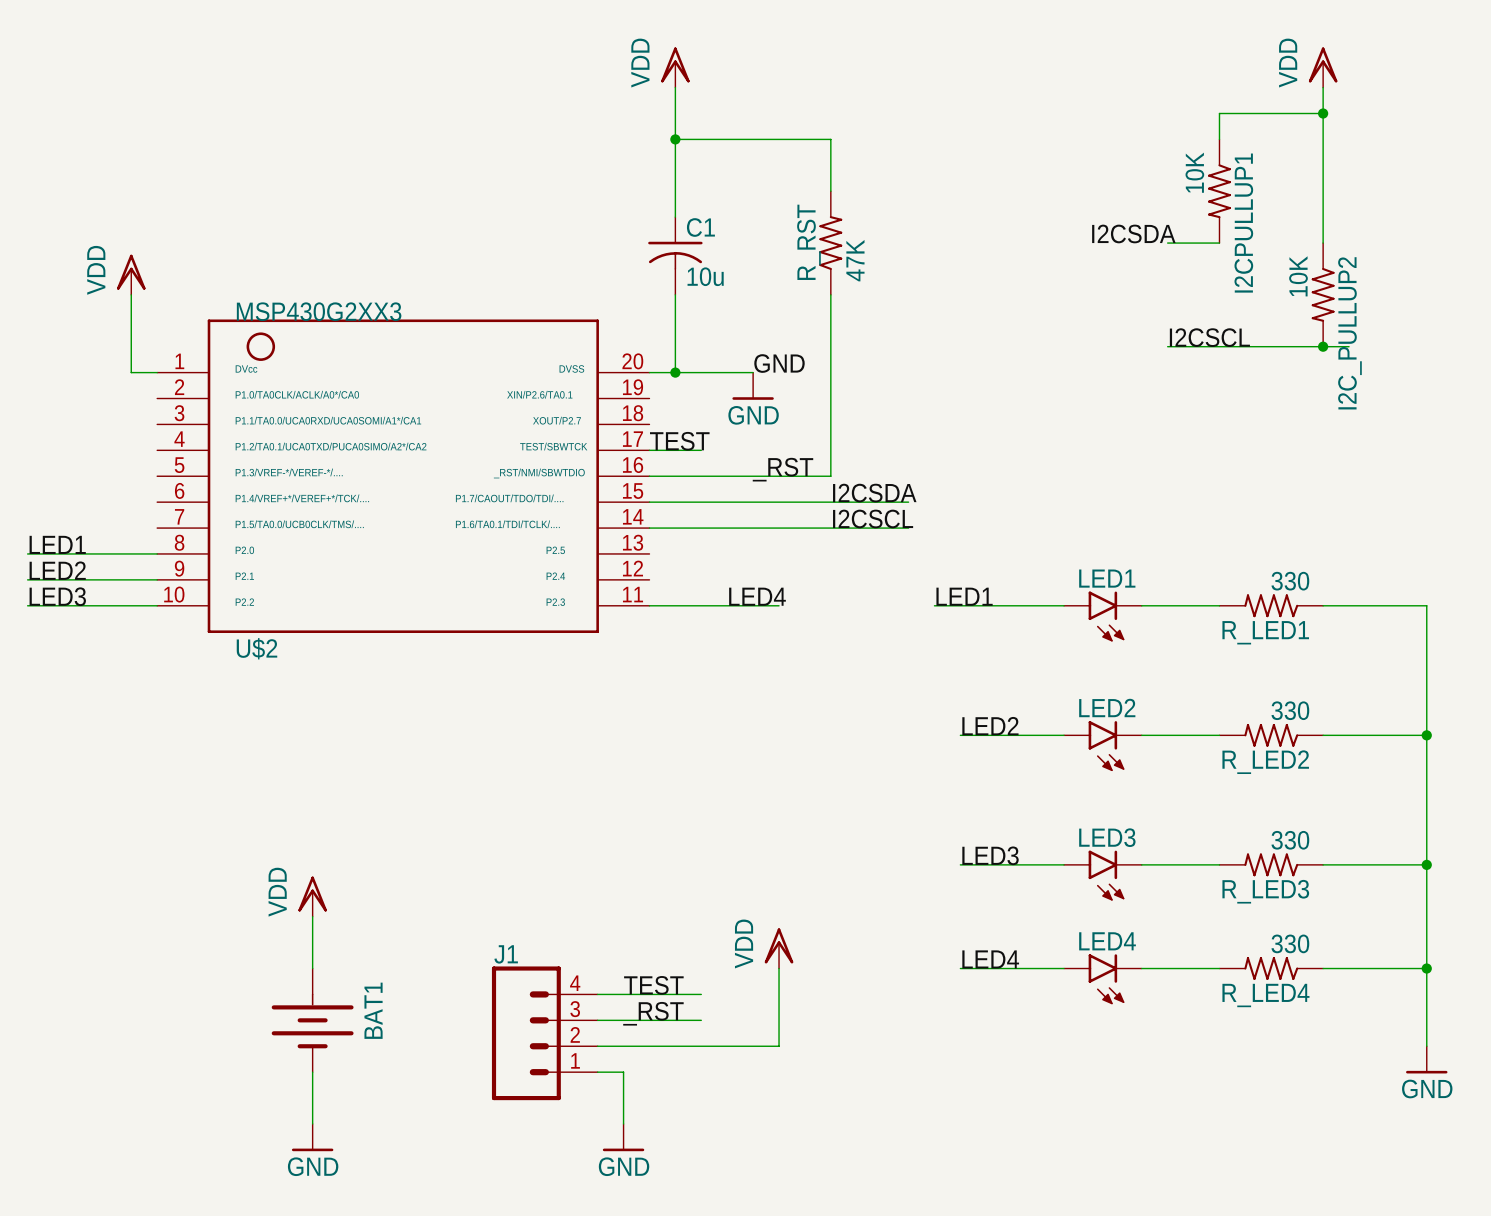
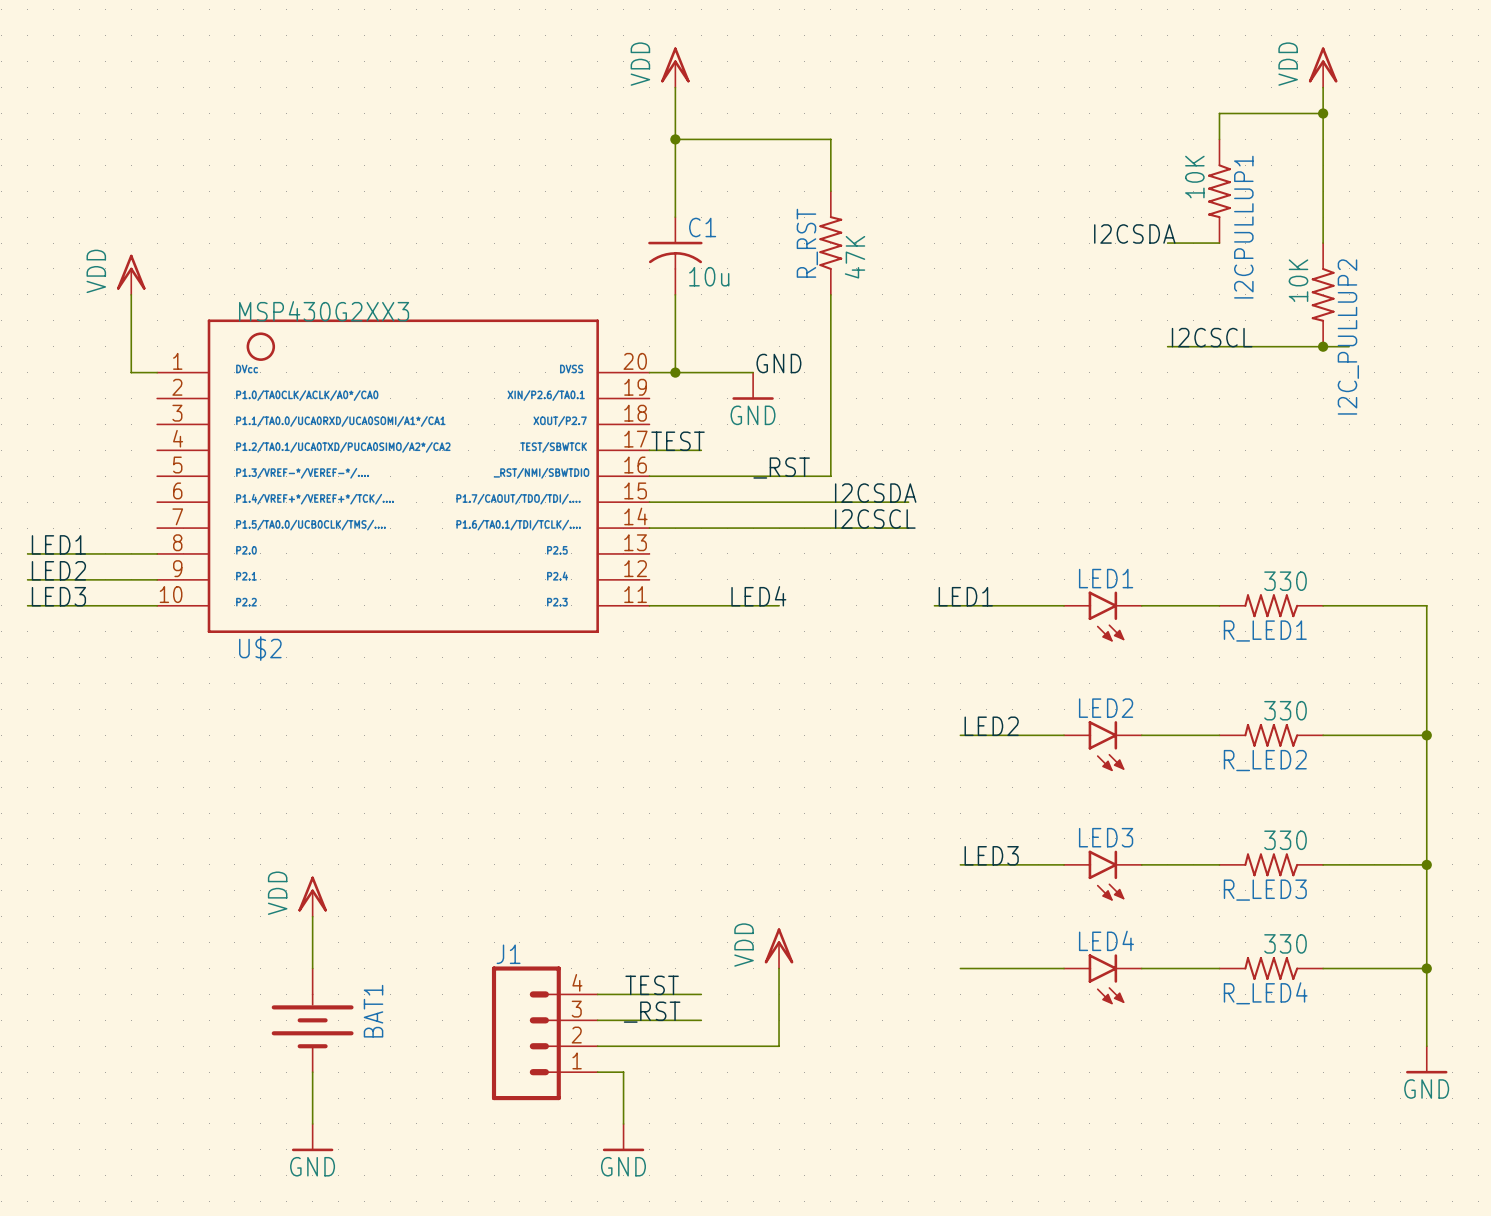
label: LED4 (990, 959) -> none

